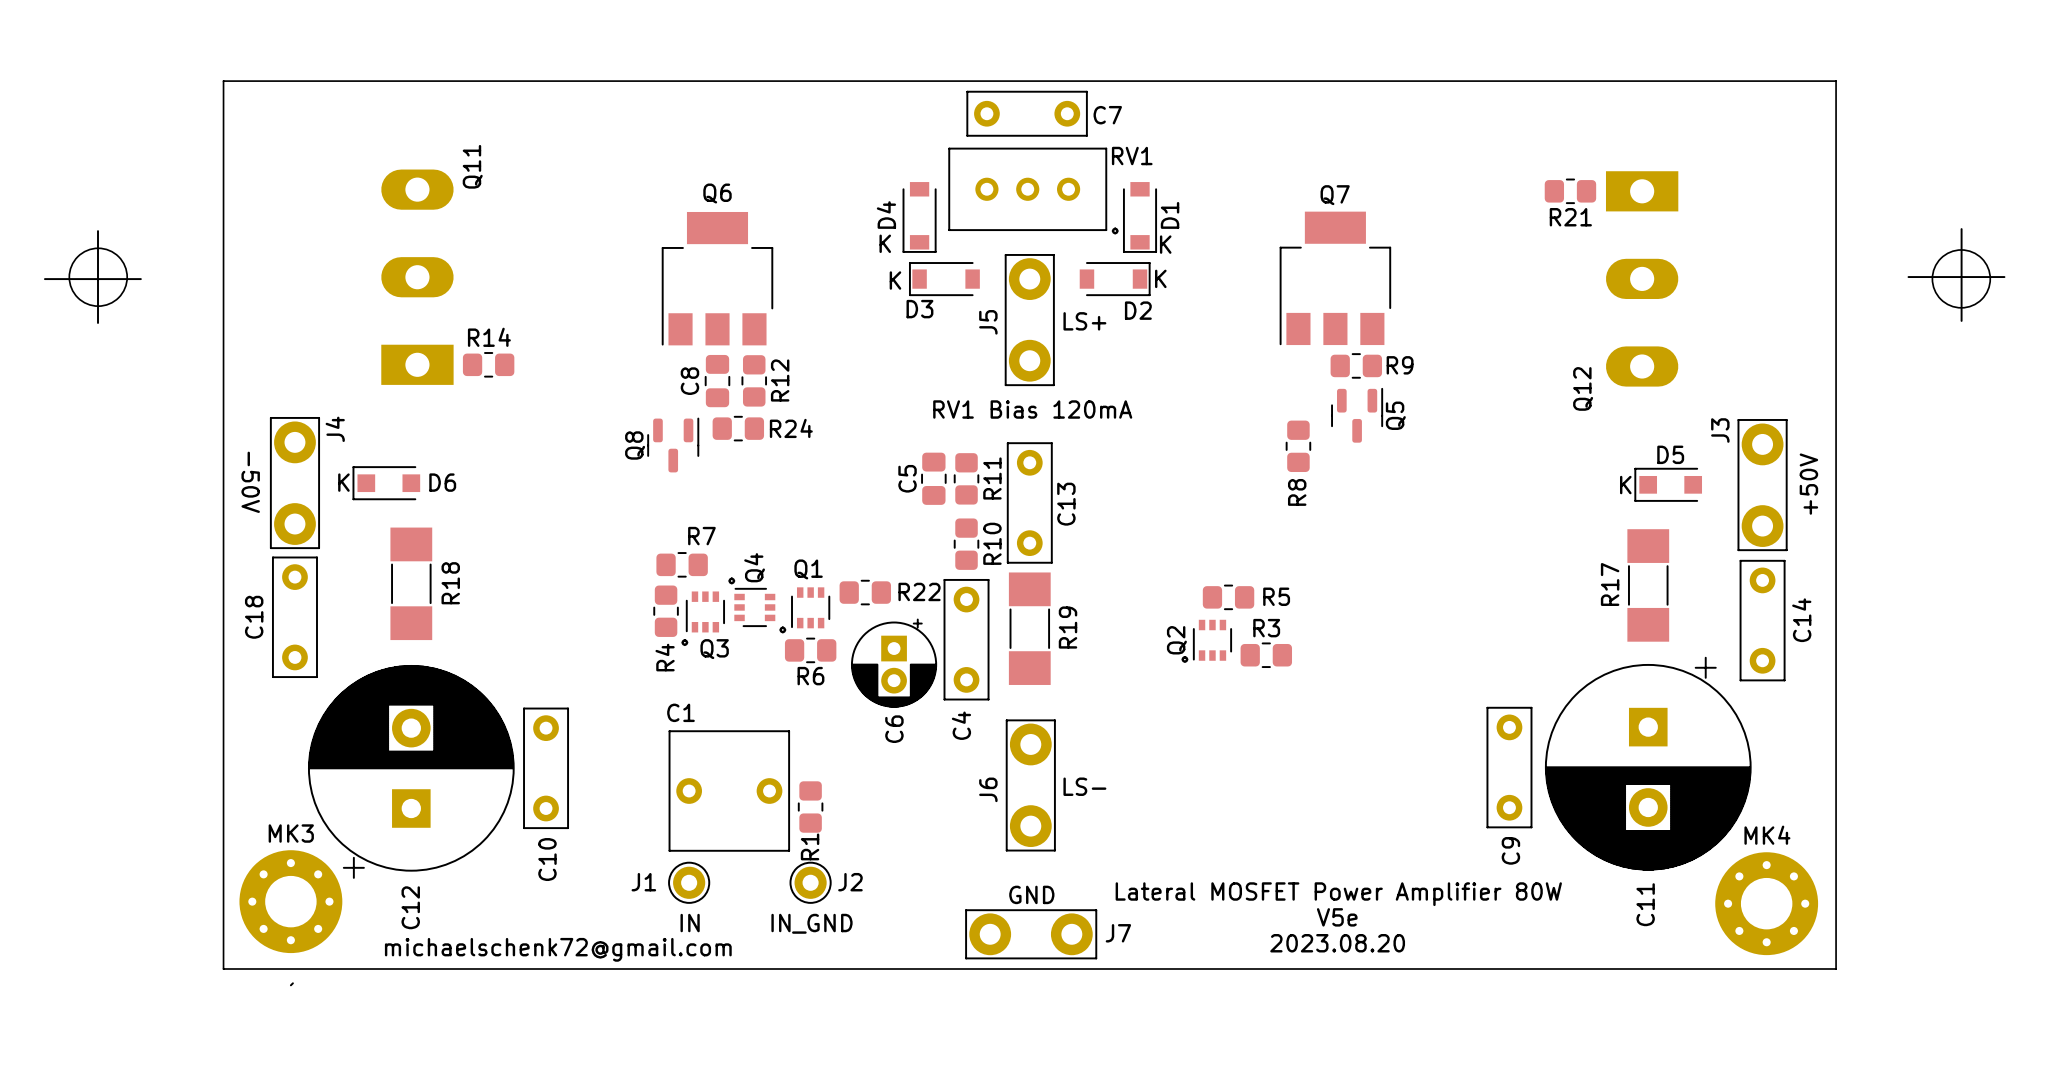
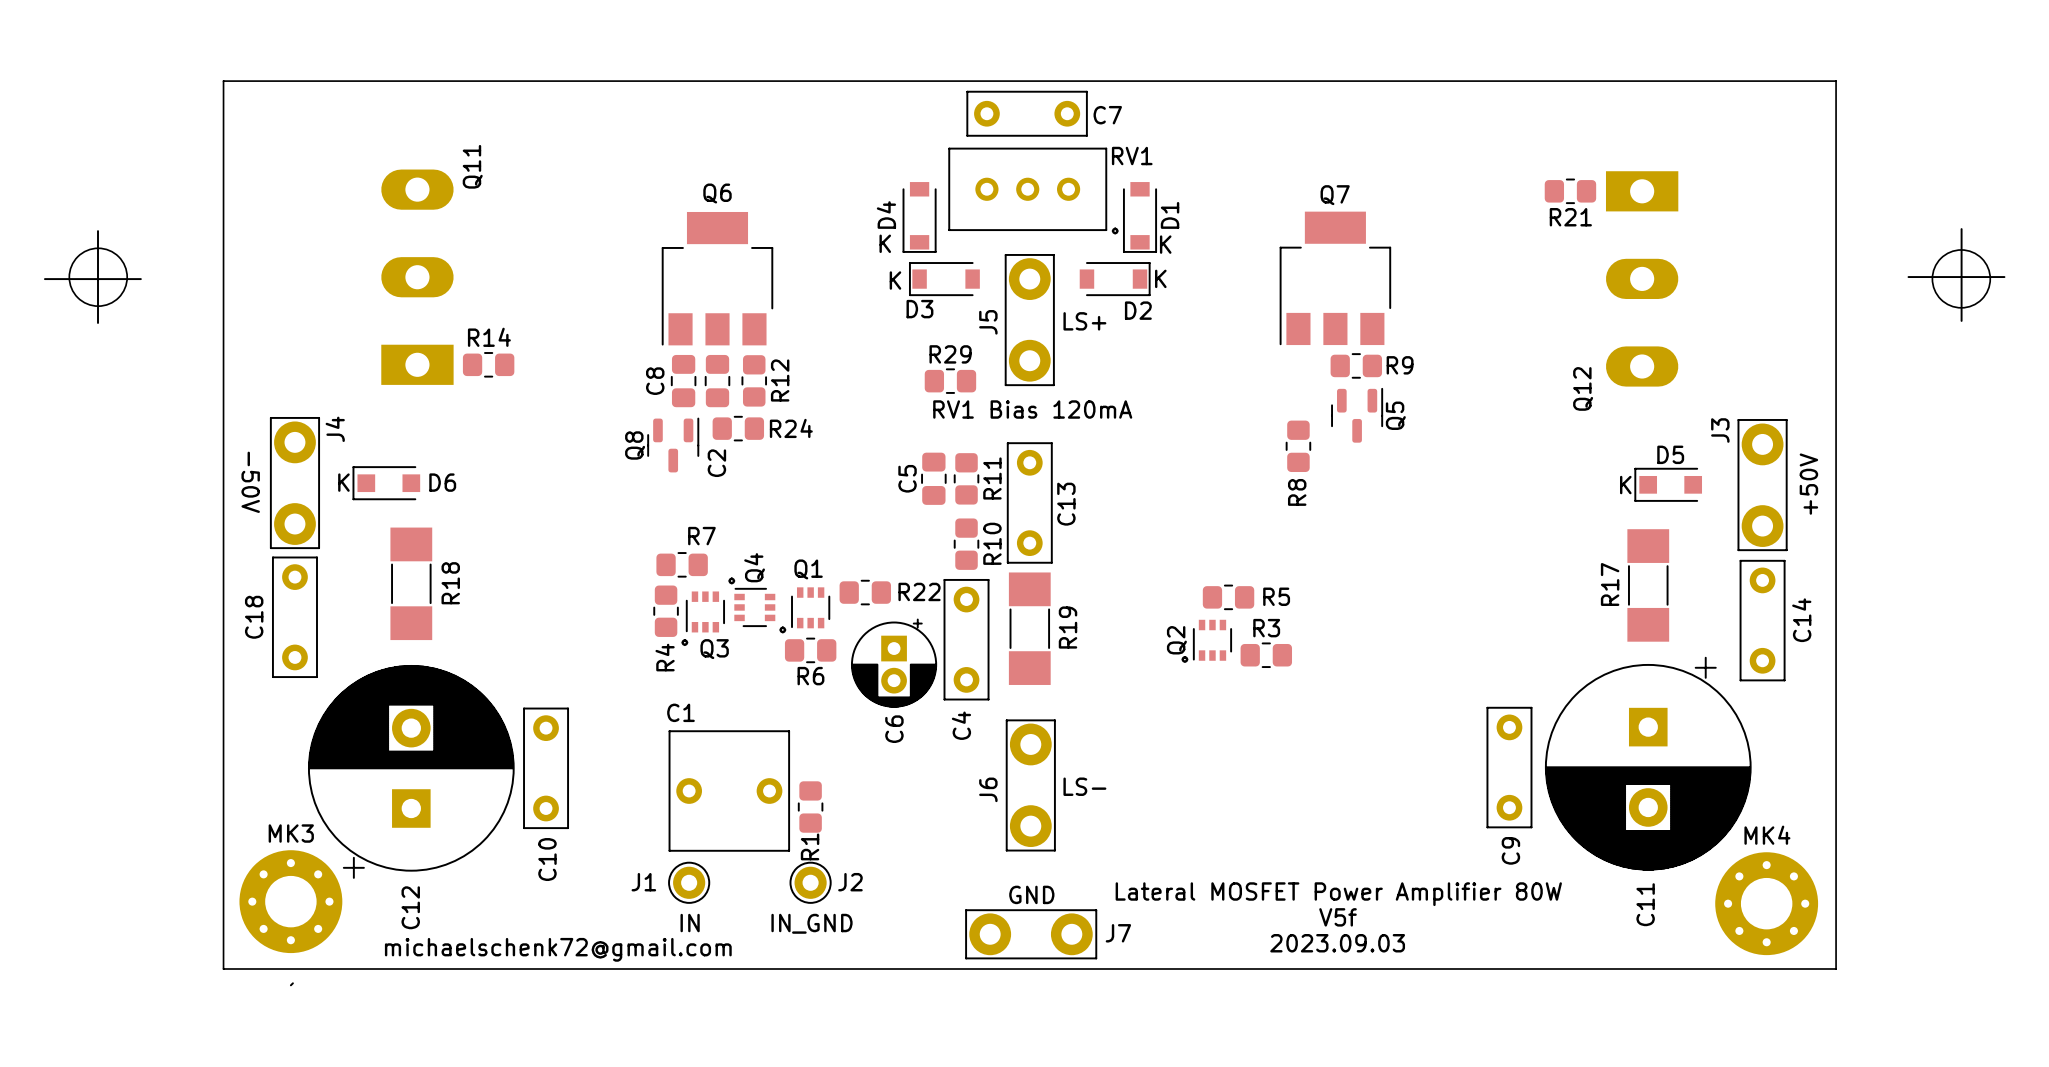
C8: none -> (683, 381)
C8 name: C8 (689, 381) -> C2 (716, 463)
R29: none -> (950, 381)
text: V5e (1337, 917) -> V5f (1338, 917)
text: 2023.08.20 (1337, 943) -> 2023.09.03 (1337, 943)

